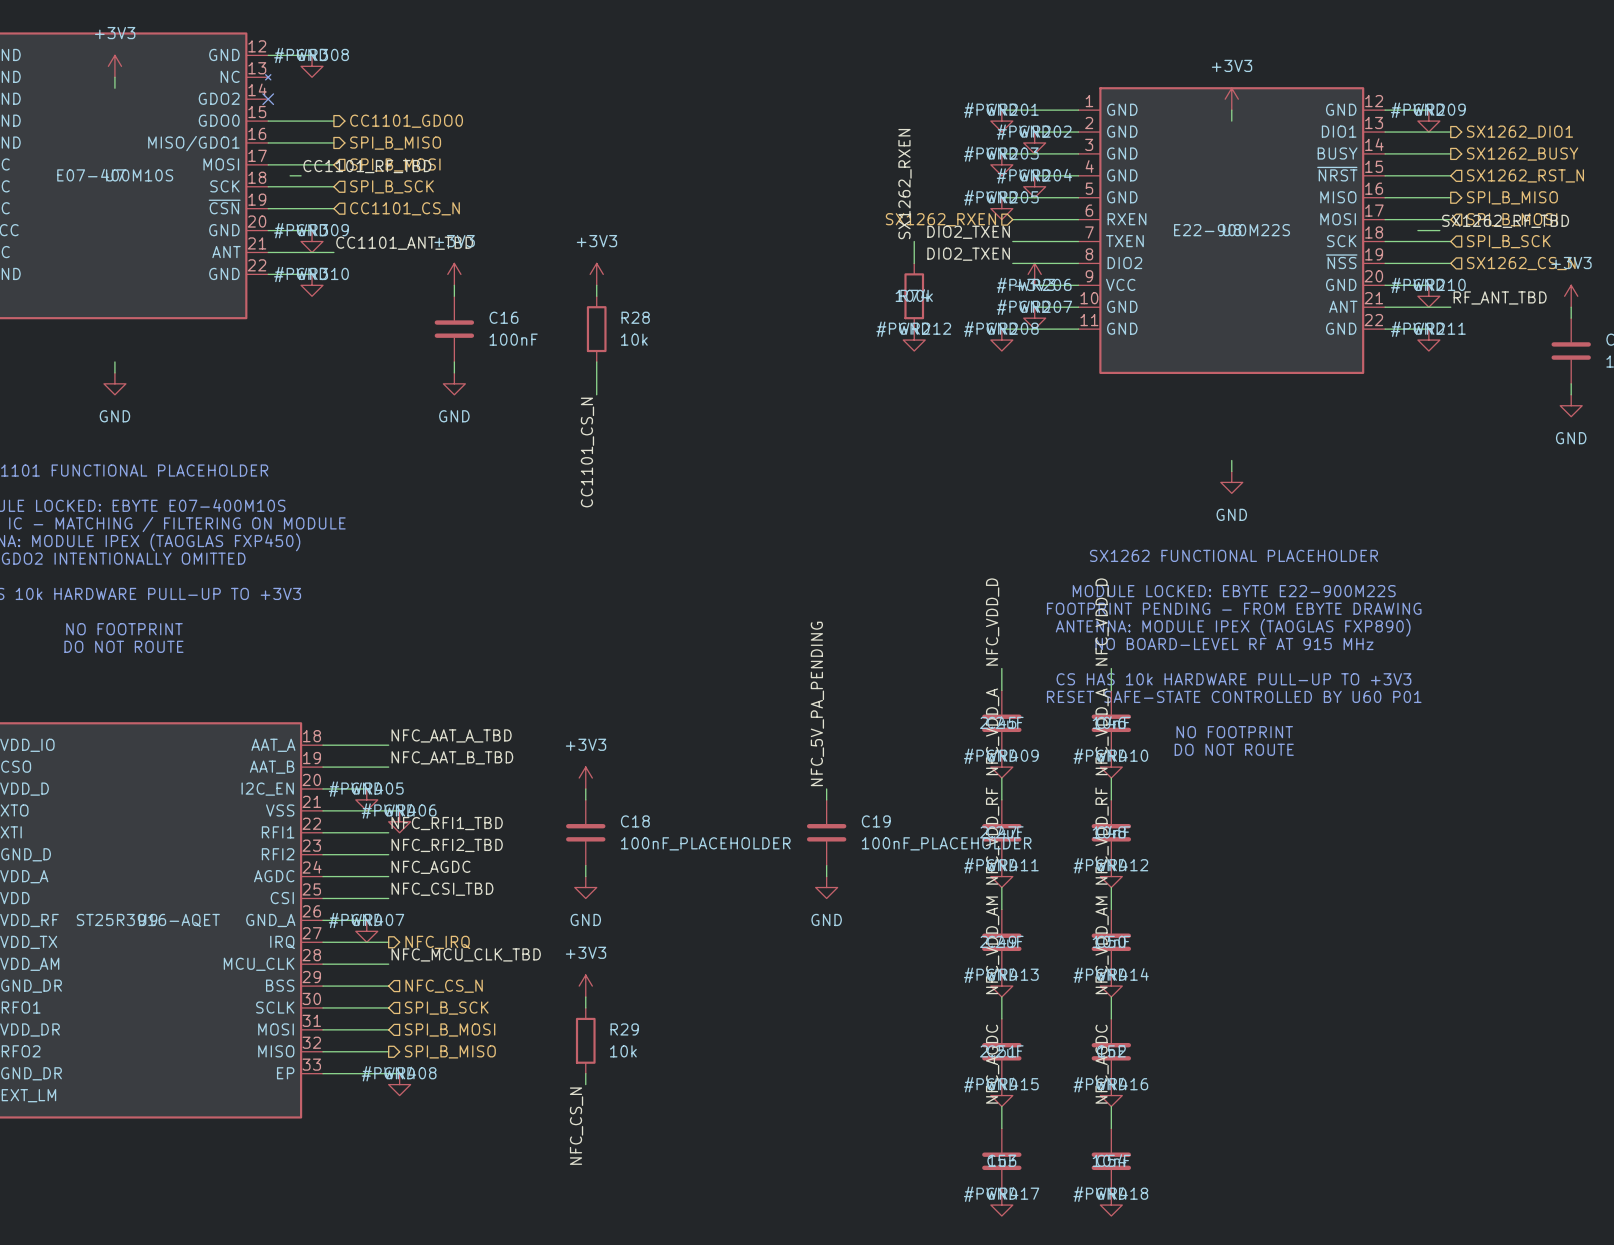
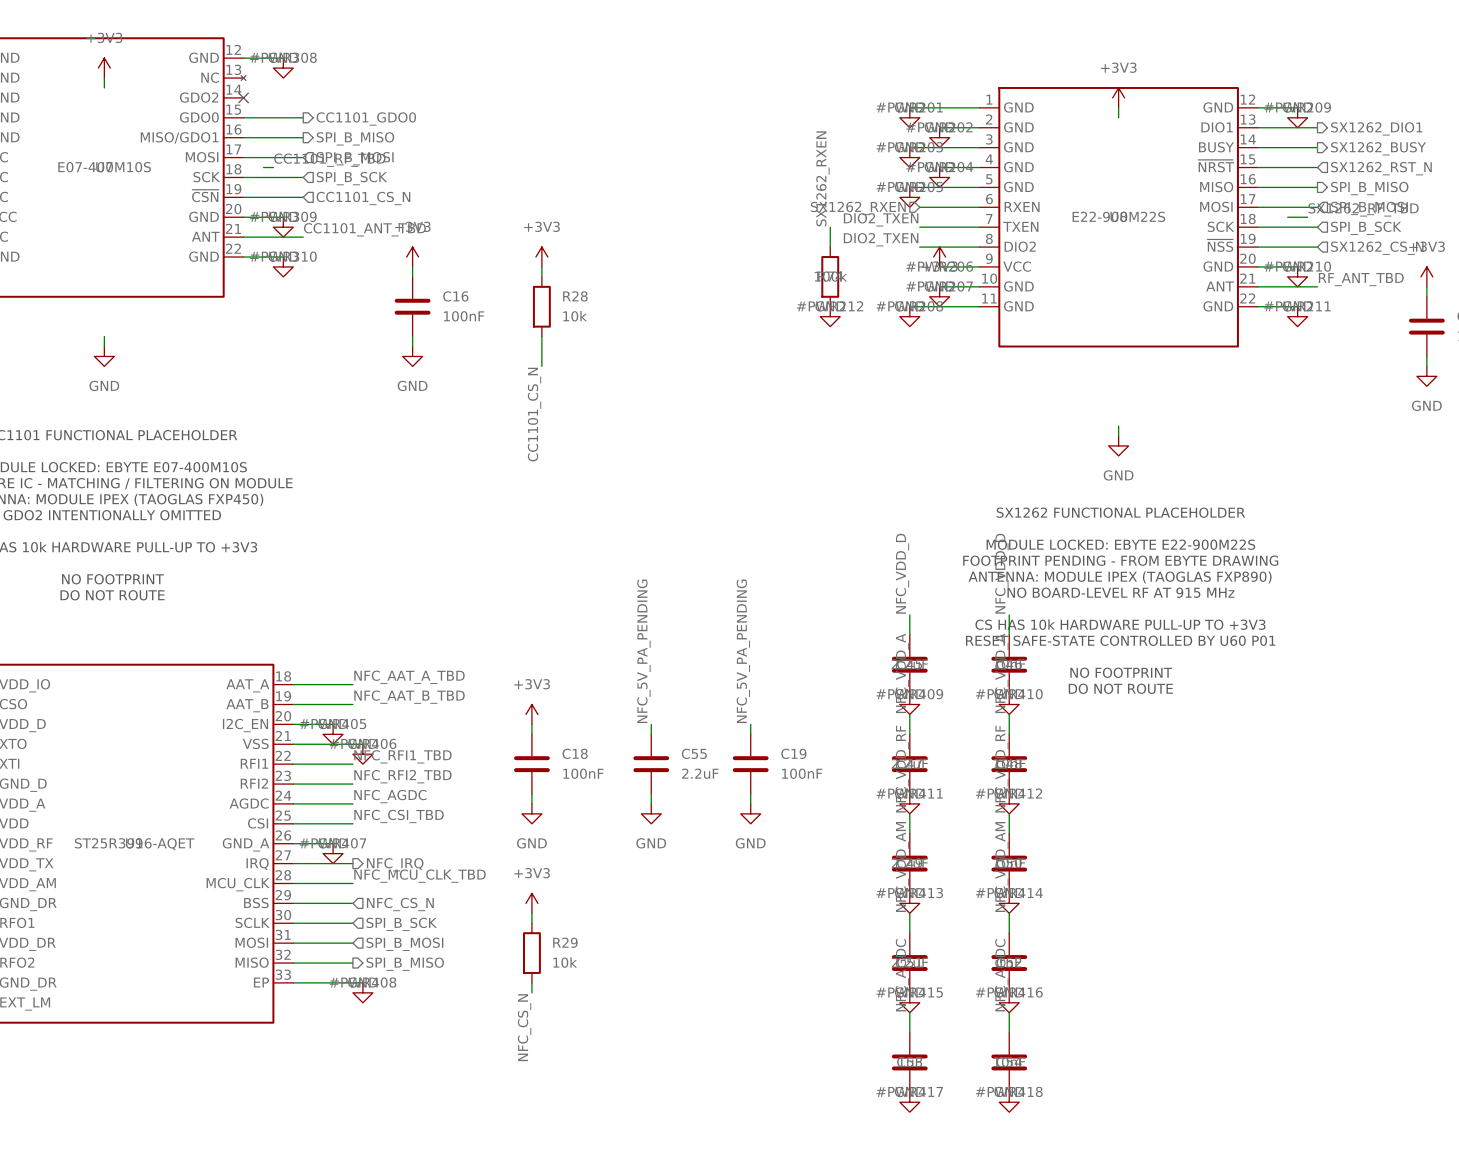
label: none -> NFC_5V_PA_PENDING (643, 651)
wire: none -> (651, 724) (651, 734)
C55: none -> 2.2uF (651, 764)
C18 value: 100nF_PLACEHOLDER (705, 843) -> 100nF (583, 773)
C19 value: 100nF_PLACEHOLDER (946, 843) -> 100nF (802, 773)
wire: none -> (651, 793) (651, 803)
power symbol: none -> GND (651, 813)

